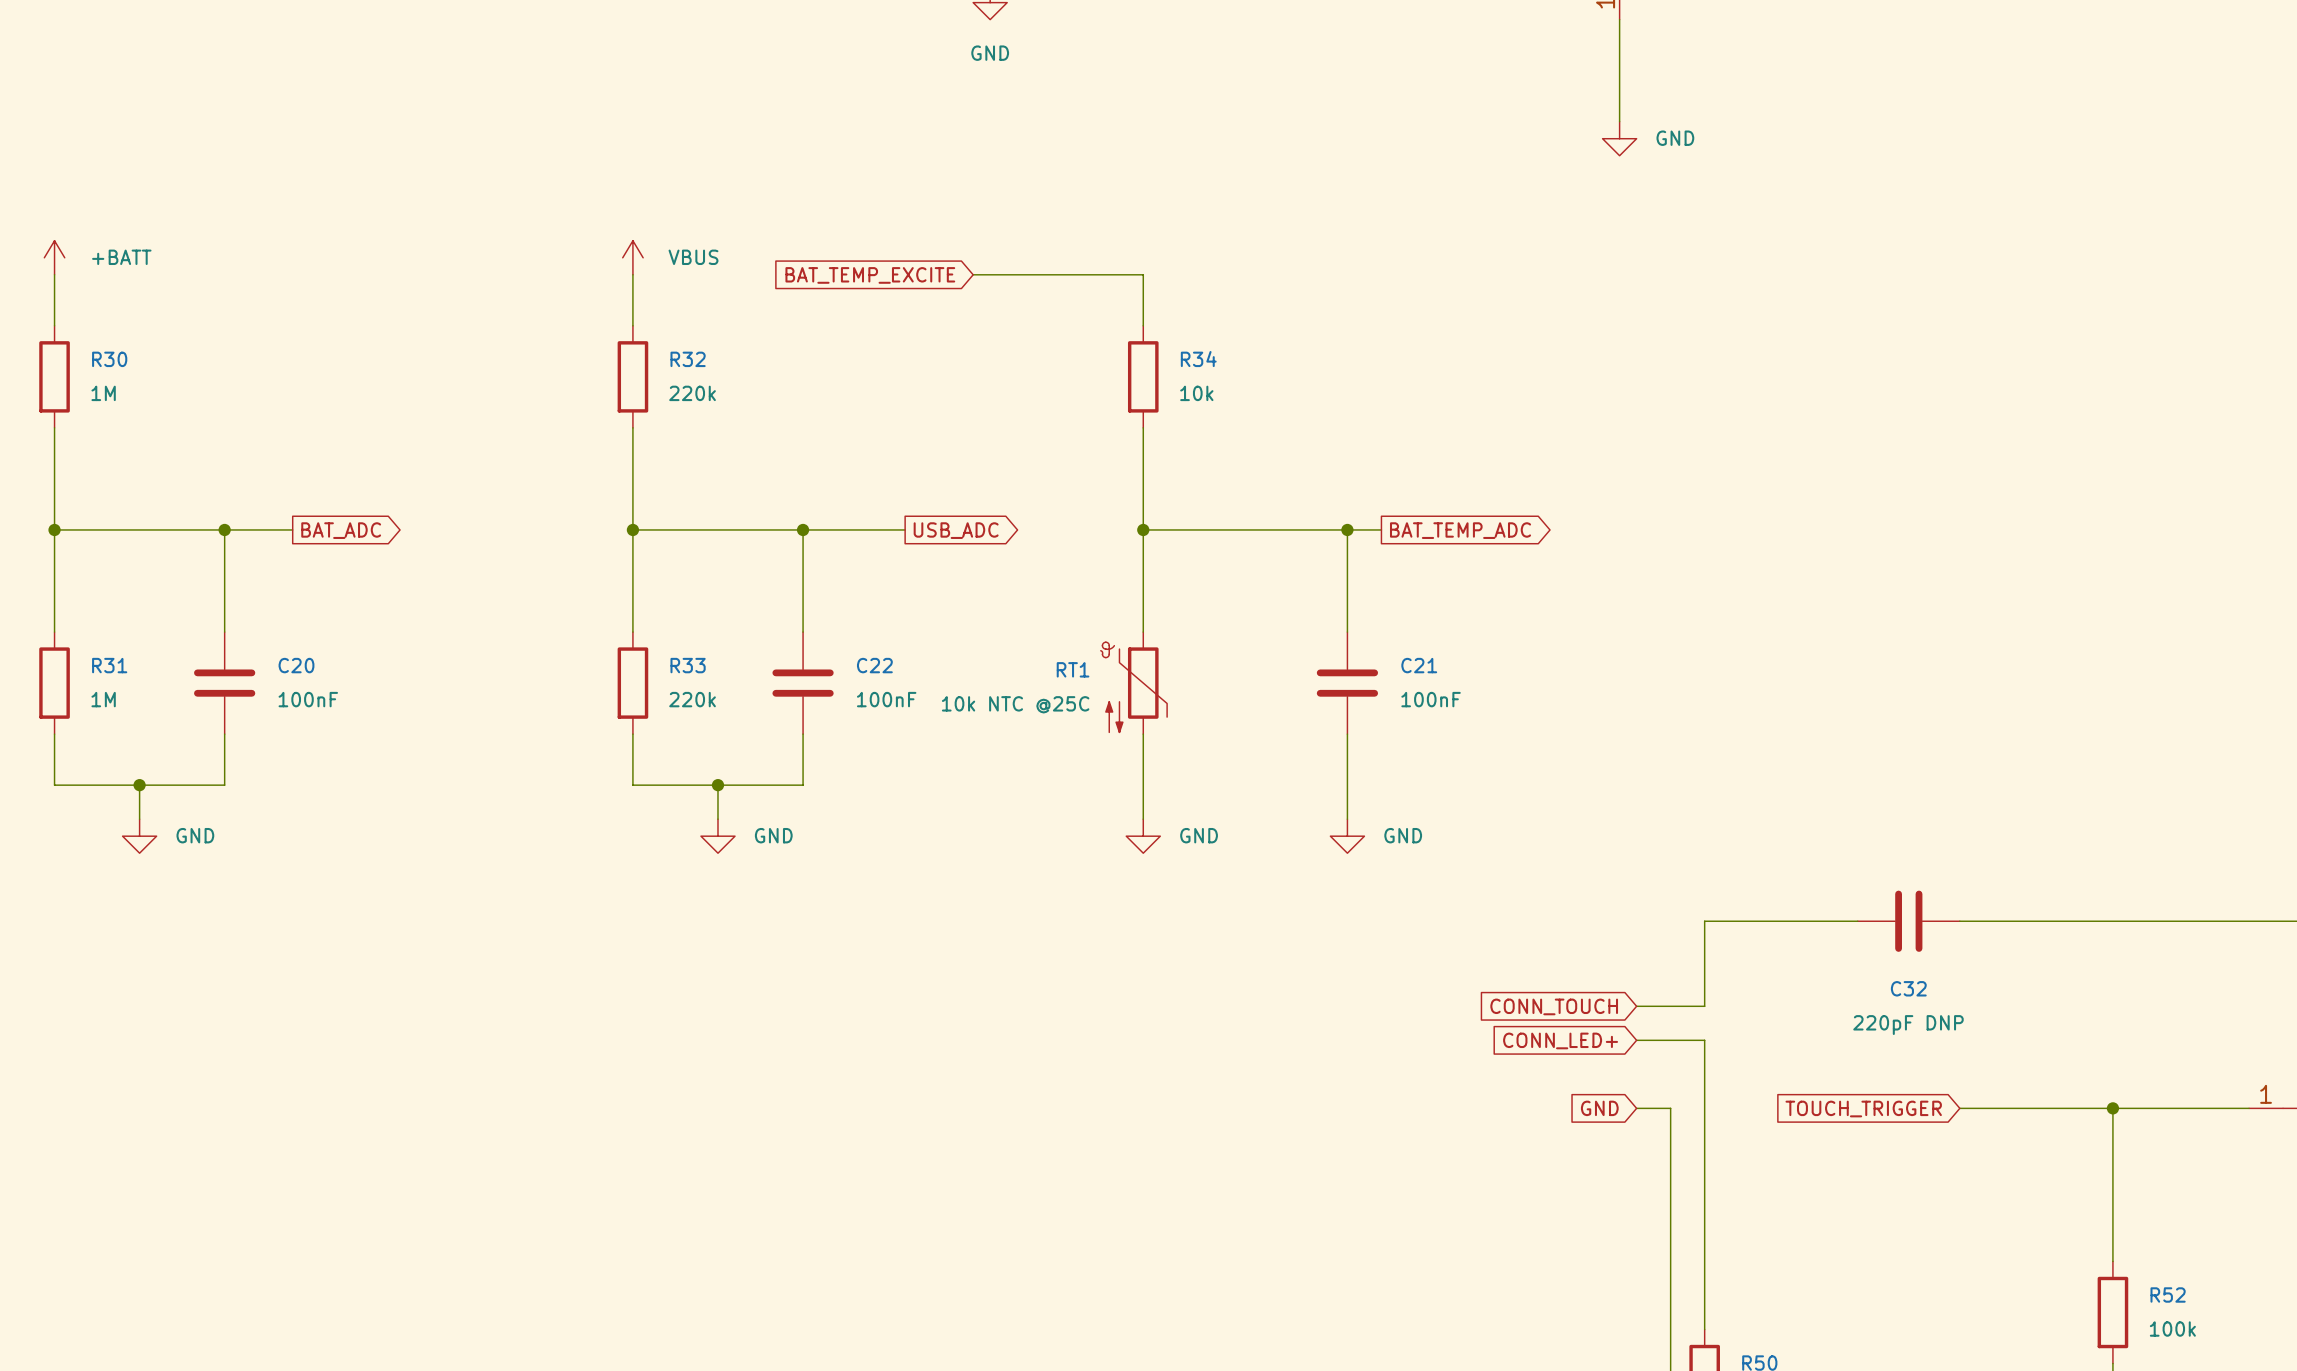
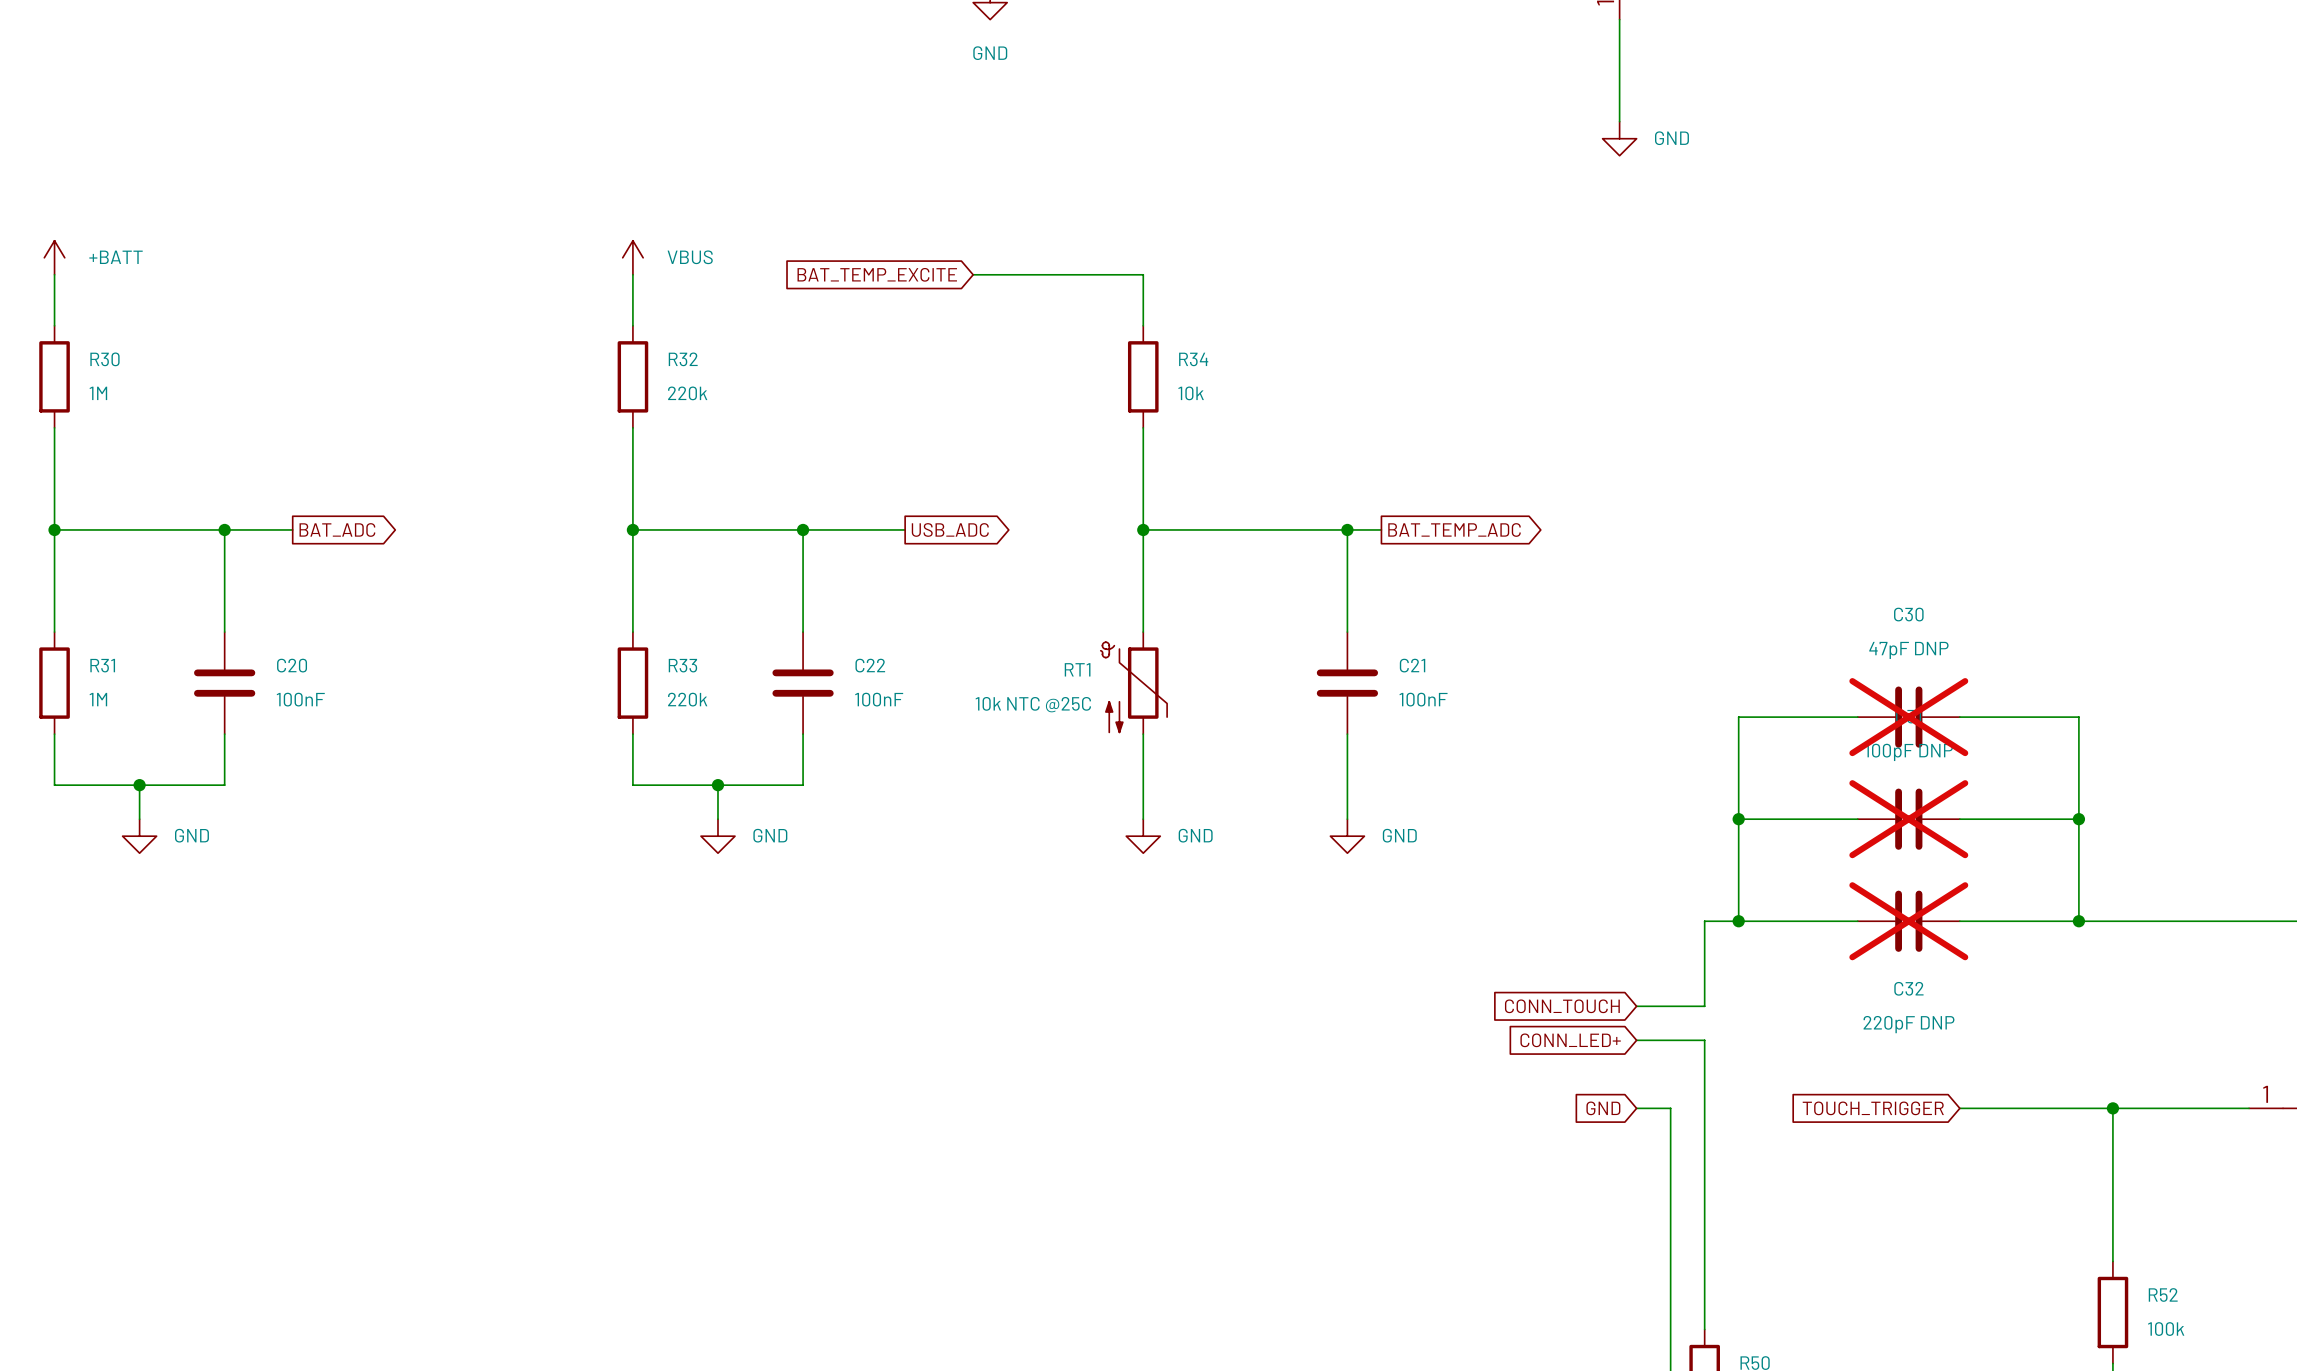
wire: none -> (1857, 717) (1738, 717) (1738, 921)
C30: none -> 47pF DNP (1908, 717)
wire: none -> (1959, 717) (2078, 717) (2078, 921)
wire: none -> (1738, 819) (1857, 819)
junction: none -> (1738, 819)
part: none -> 100pF DNP (1908, 819)
wire: none -> (1959, 819) (2078, 819)
junction: none -> (2078, 819)
junction: none -> (1738, 921)
C32 do-not-place cross: none -> (1908, 921)
junction: none -> (2078, 921)

